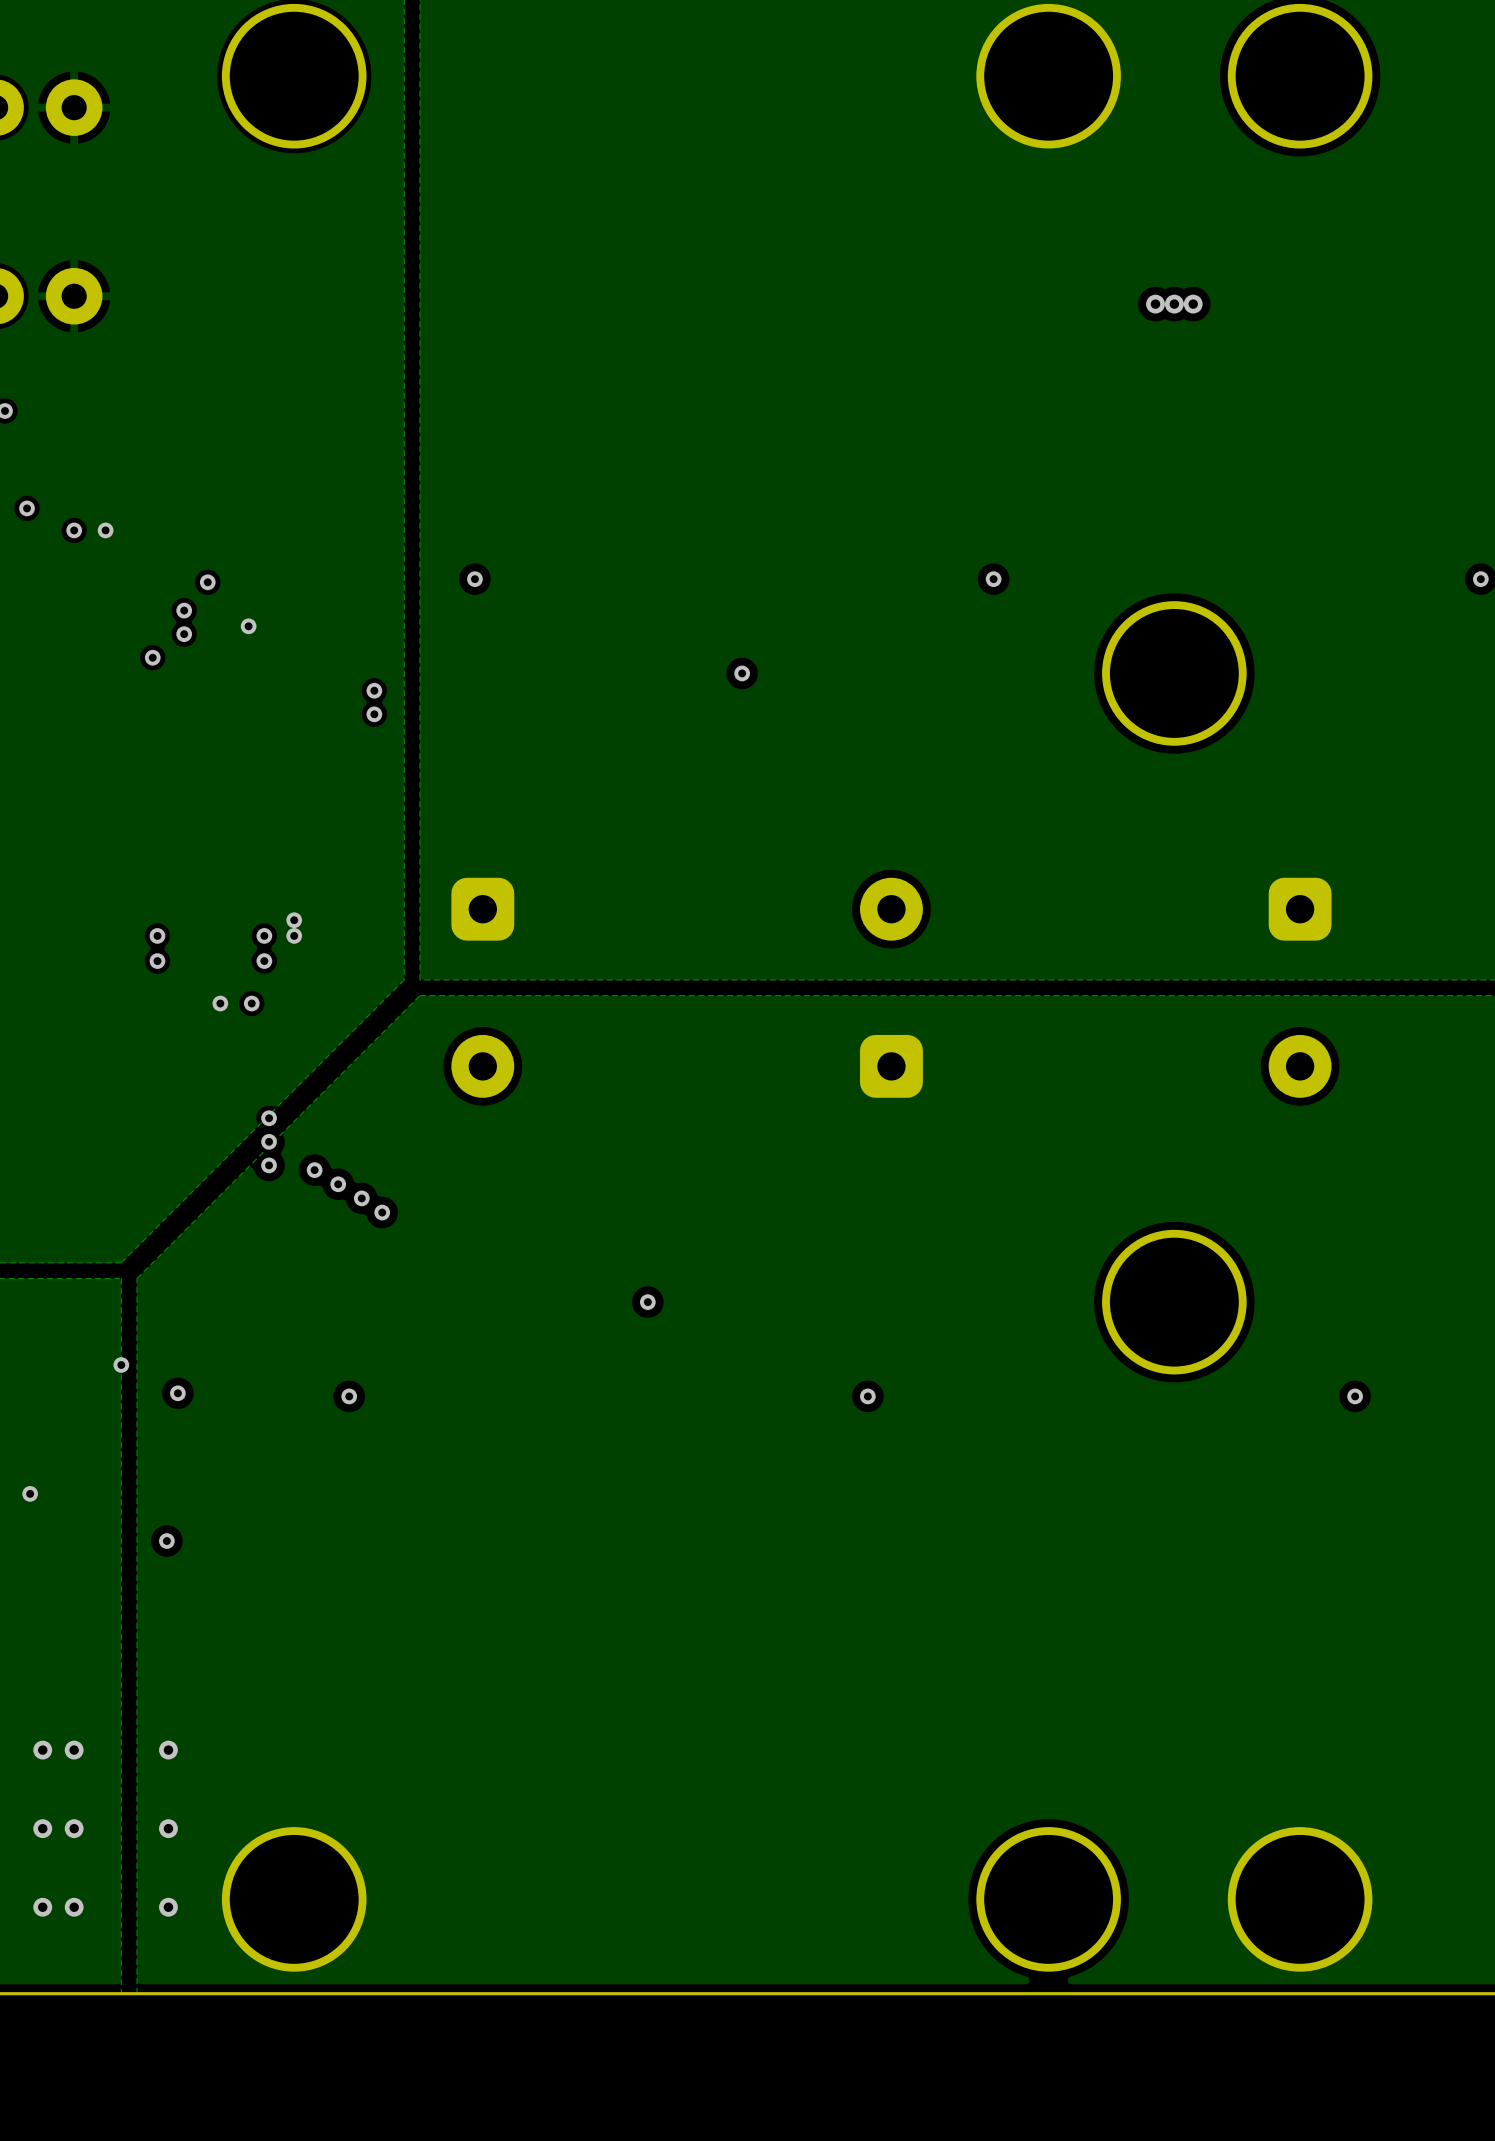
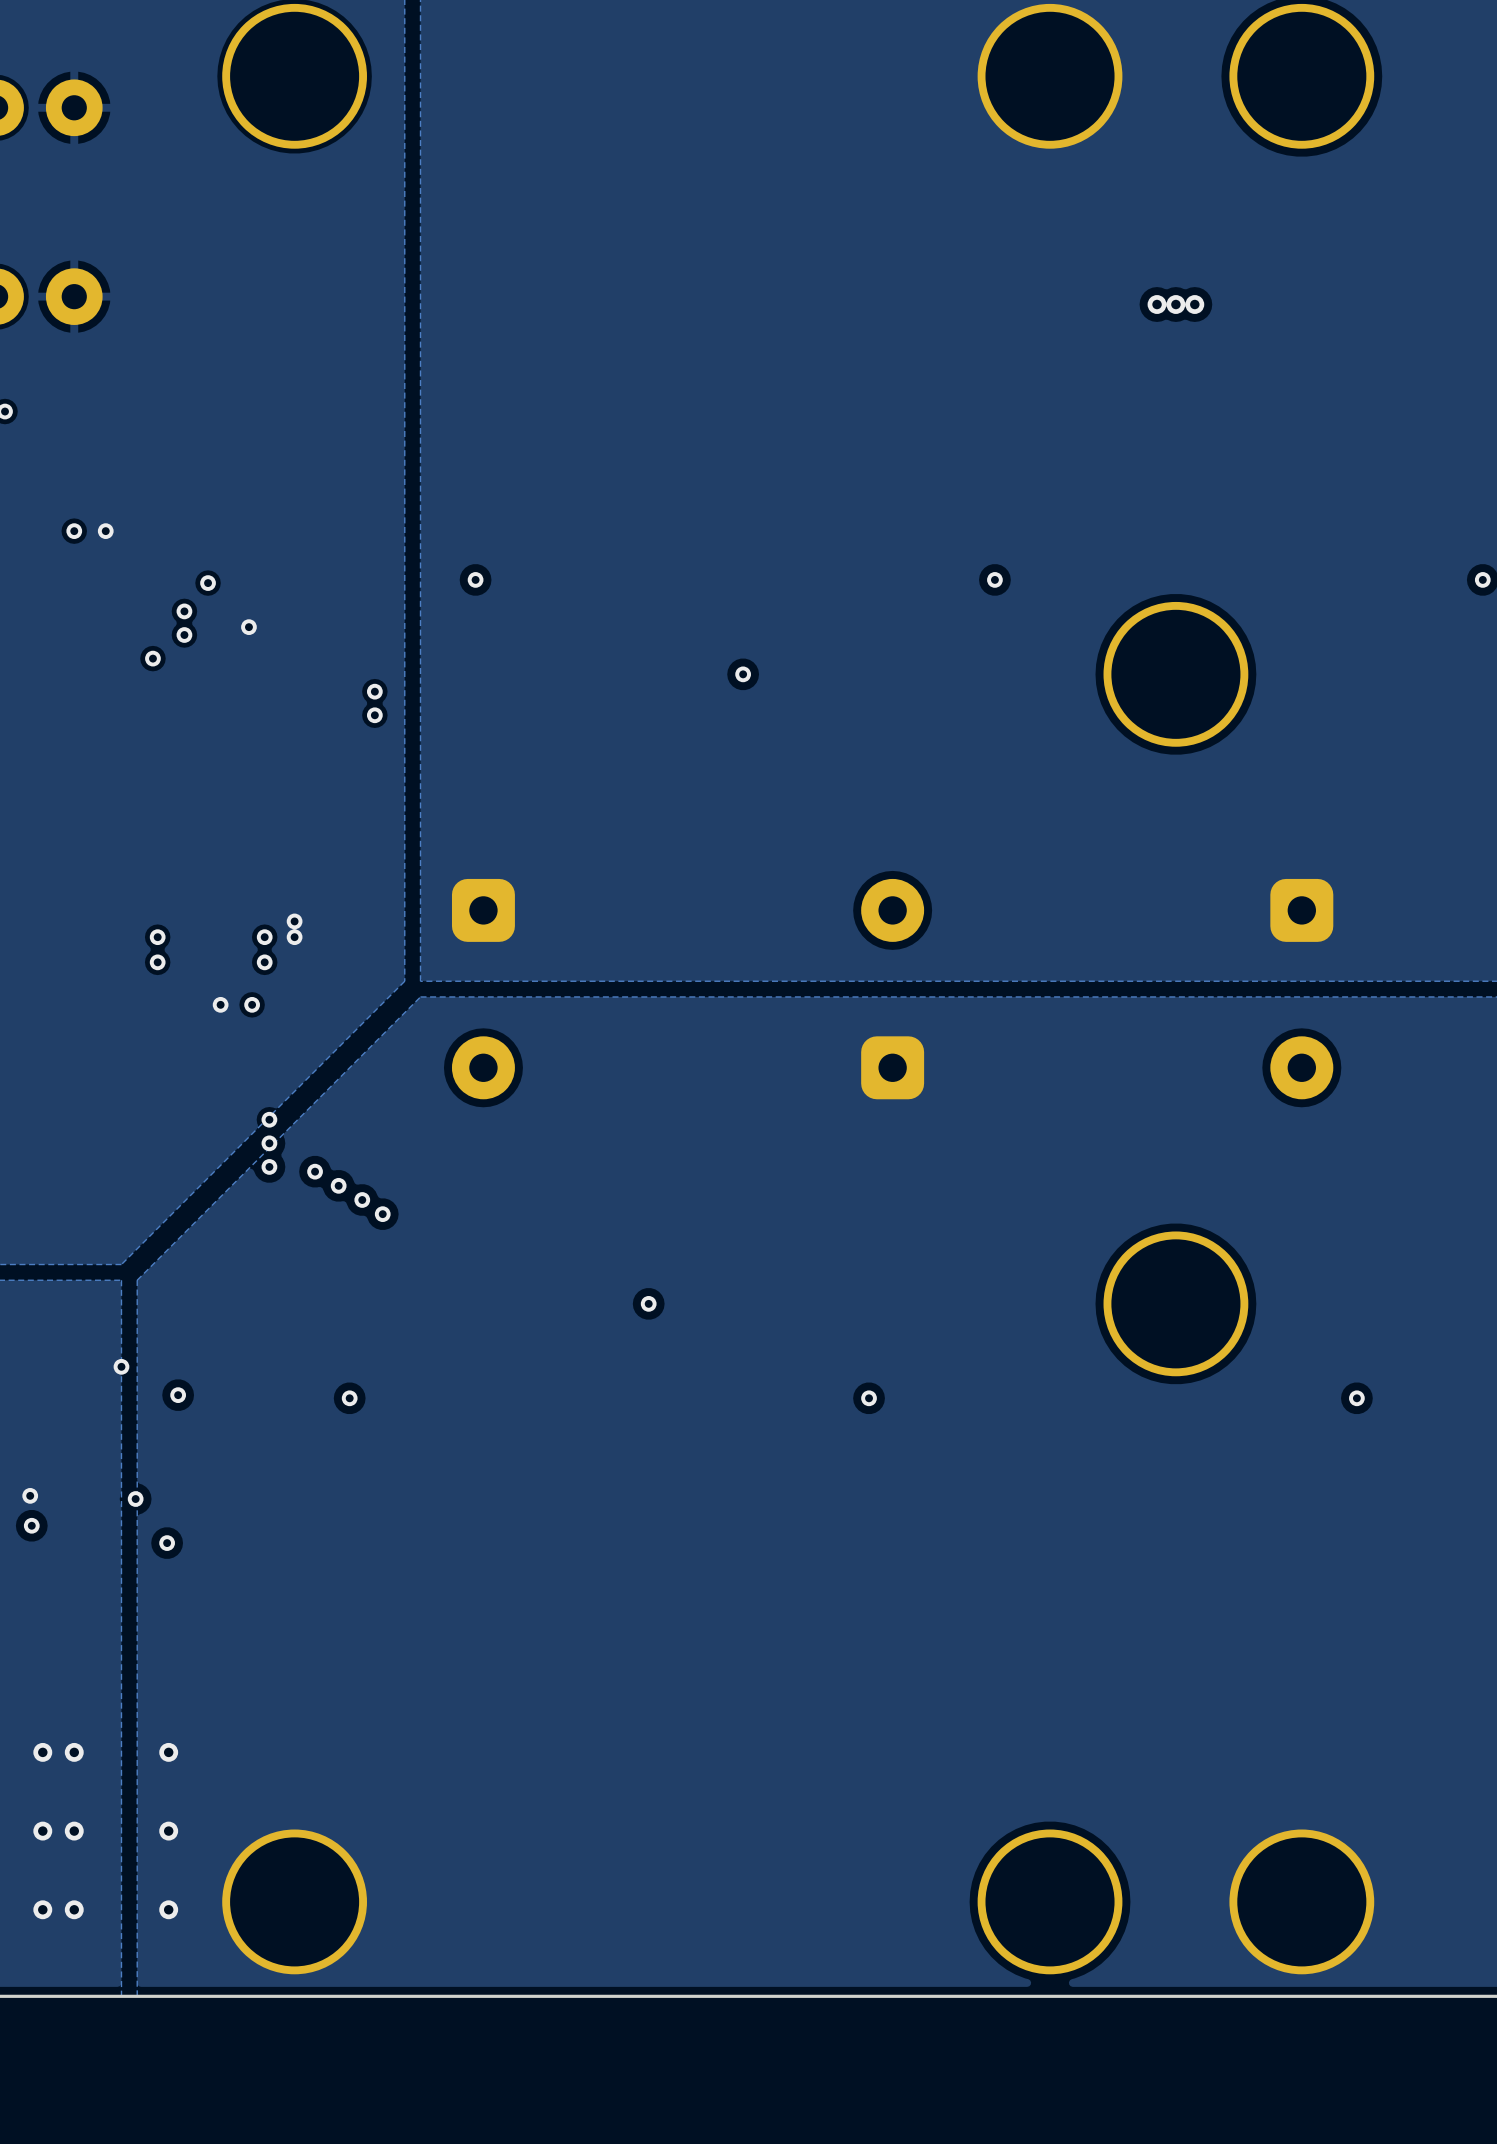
via: (27, 508) -> none
via: none -> (135, 1499)
via: none -> (31, 1525)

